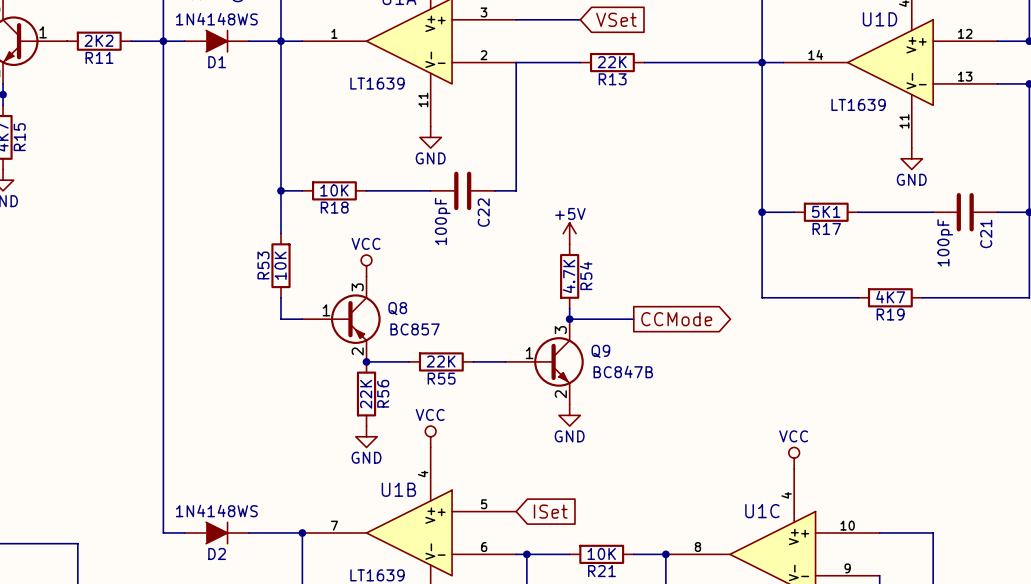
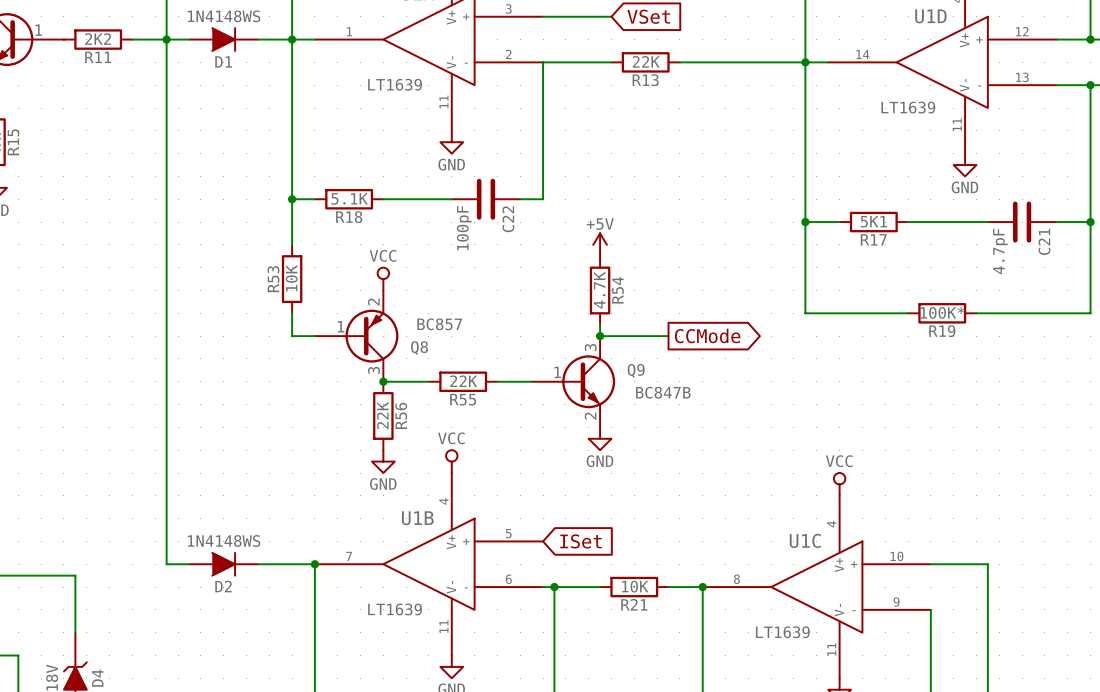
R18 value: 10K (334, 190) -> 5.1K (349, 198)
C21 value: 100pF (945, 242) -> 4.7pF (1000, 251)
R19 value: 4K7 (890, 297) -> 100K* (942, 312)
Q8 flip: as is (355, 319) -> up-down (371, 336)

